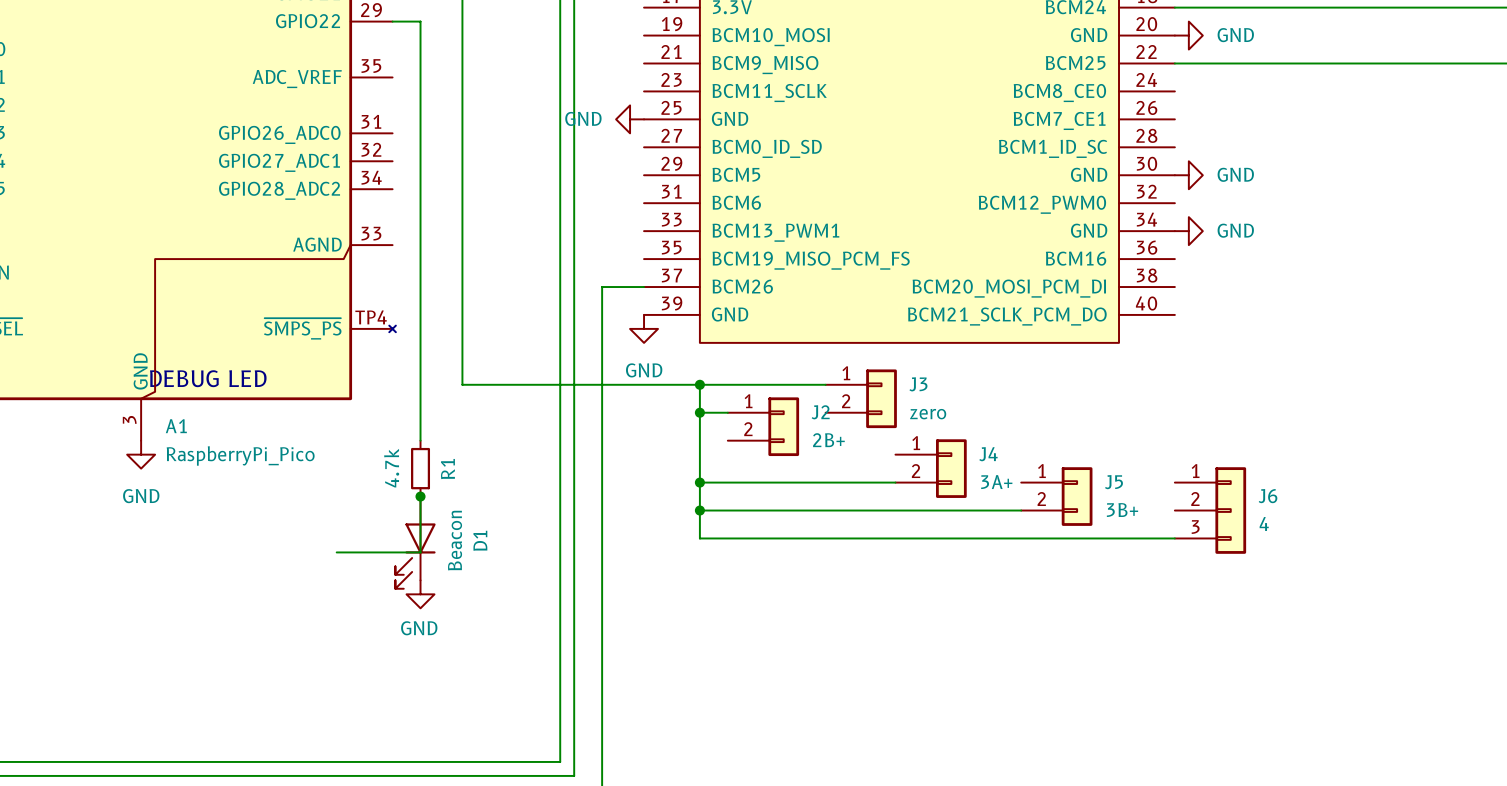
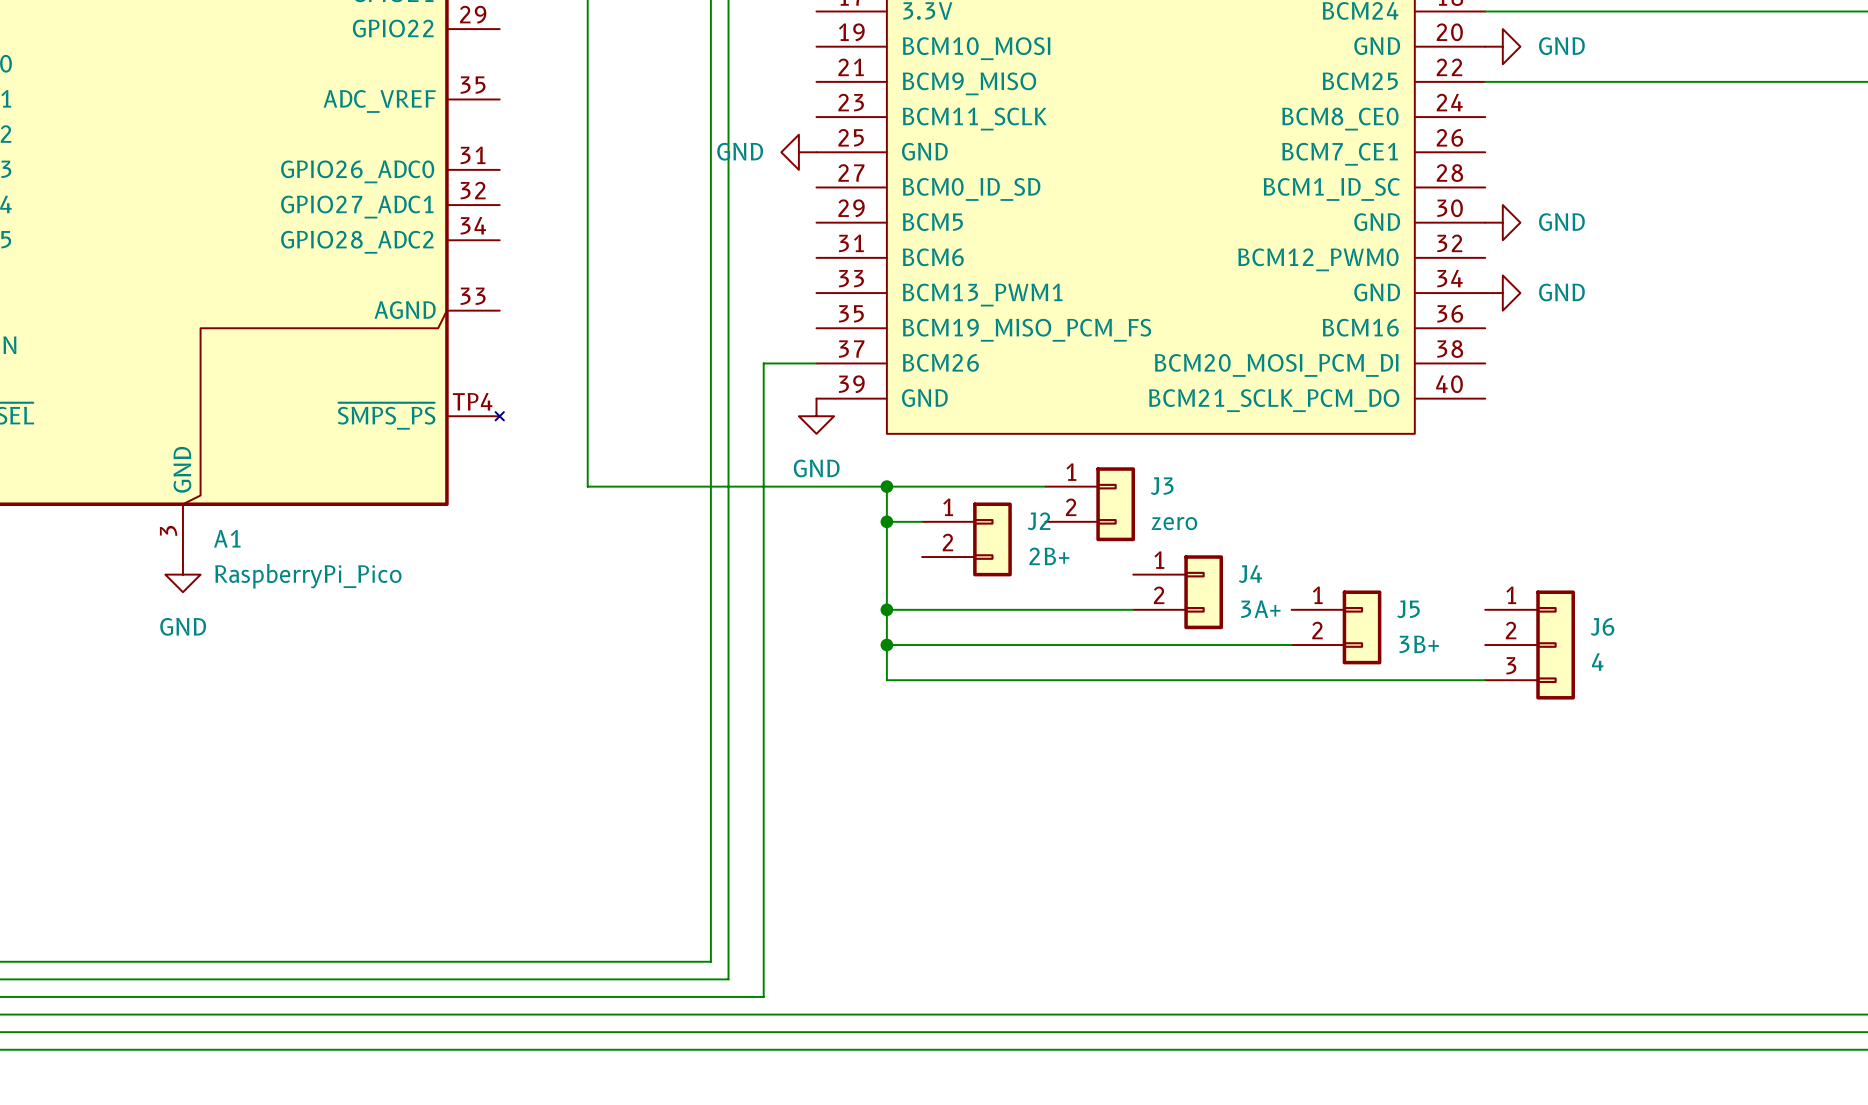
wire: (392, 21) (420, 21) (420, 440) -> none
text: DEBUG LED (208, 378) -> none
R1: 4.7k (420, 468) -> none
wire: (420, 496) (420, 552) (336, 552) -> none
junction: (420, 496) -> none
D1: Beacon (415, 542) -> none
power symbol: GND (420, 594) -> none

